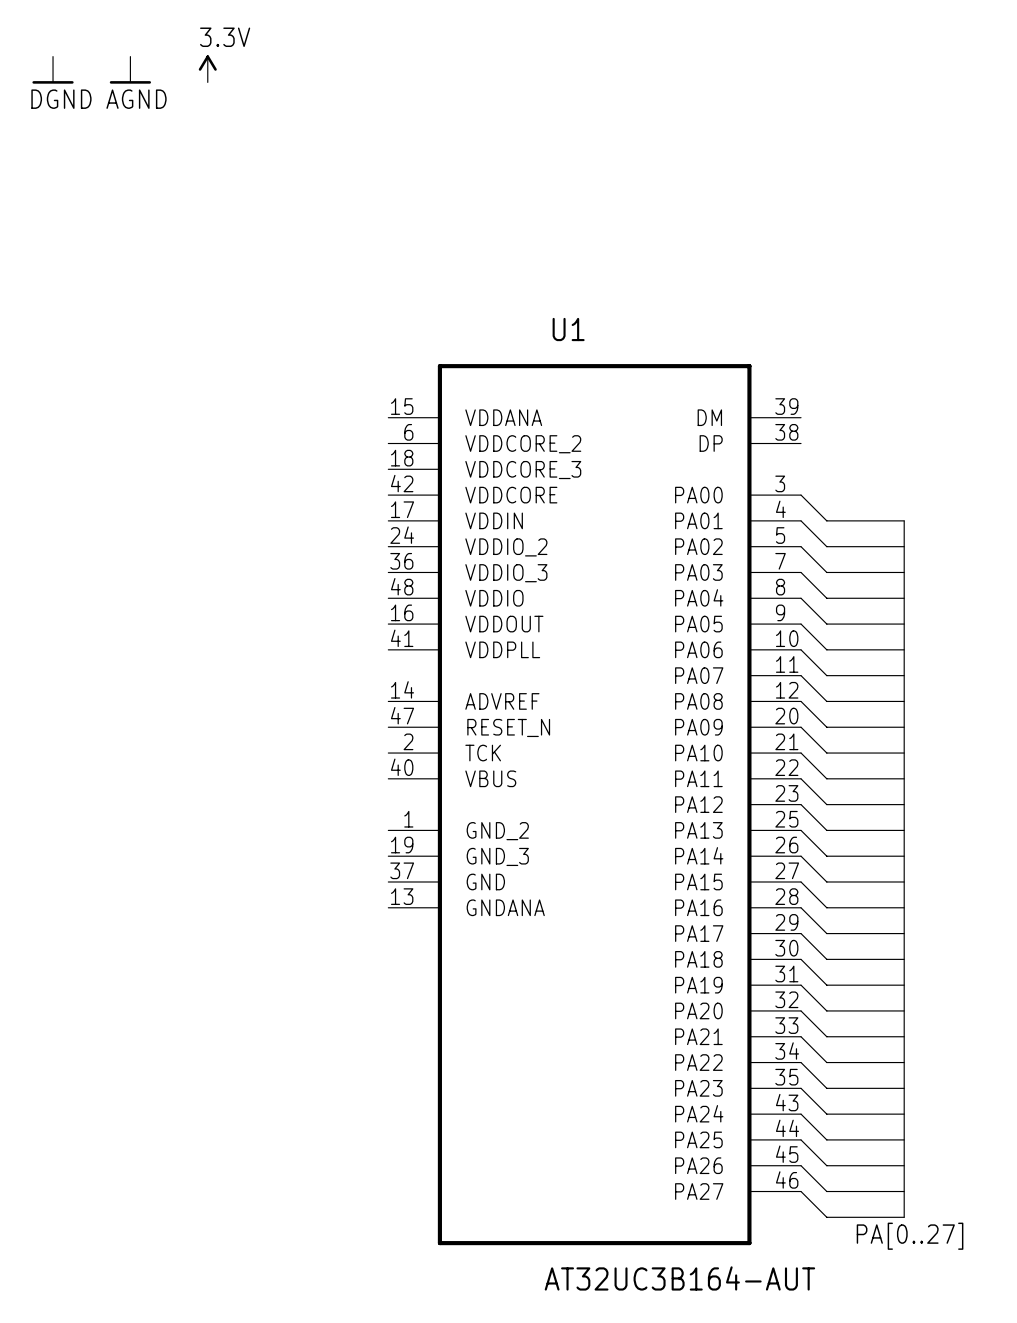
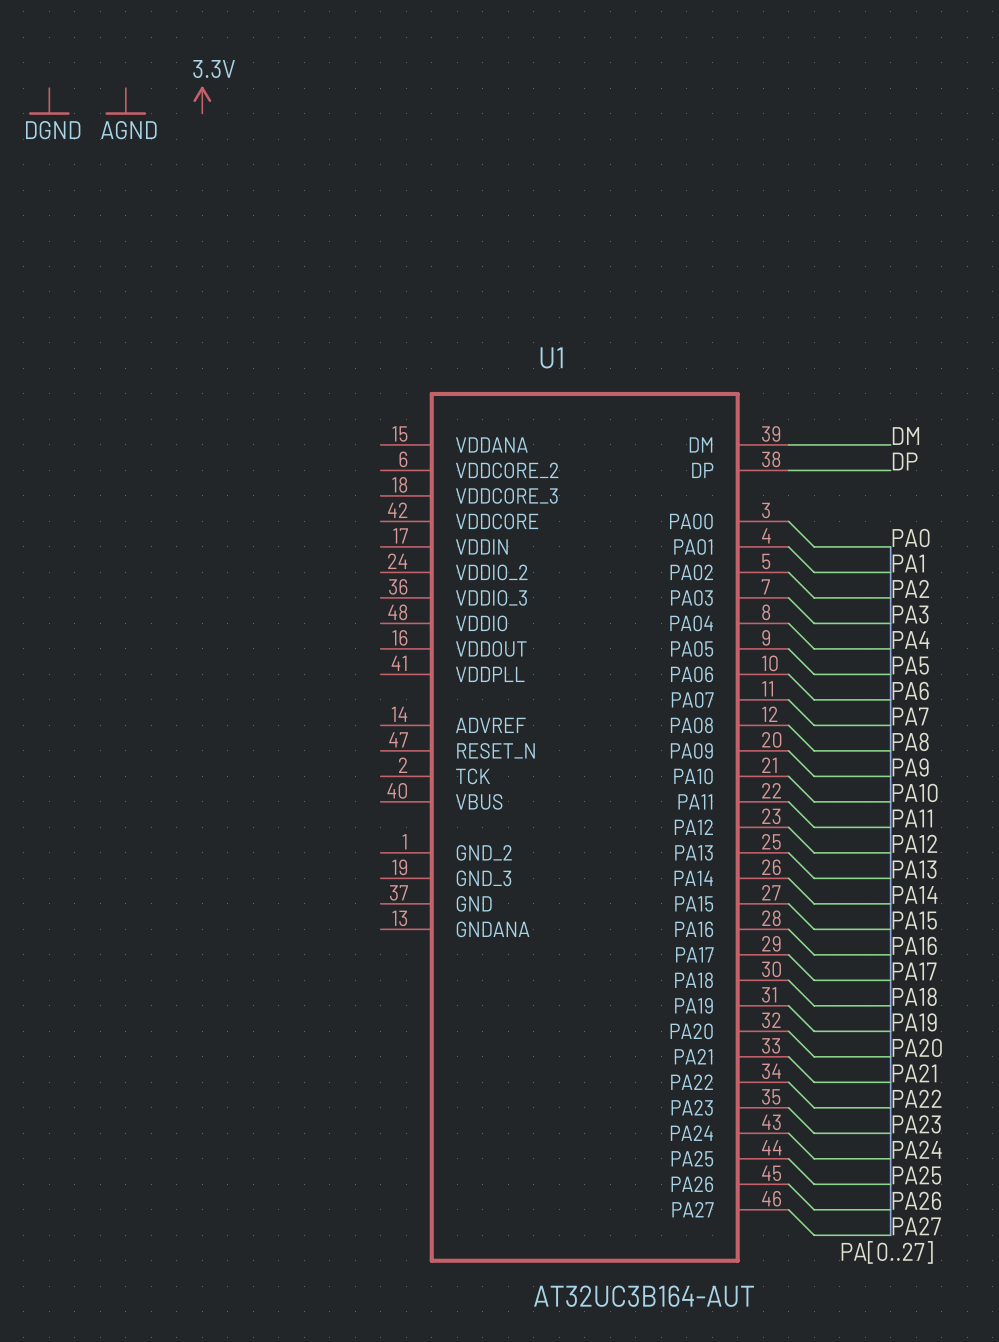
label: none -> DM (905, 436)
wire: none -> (788, 444) (890, 444)
label: none -> DP (905, 461)
wire: none -> (788, 470) (890, 470)
label: none -> PA0 (911, 538)
label: none -> PA1 (908, 563)
label: none -> PA2 (910, 588)
label: none -> PA3 (910, 614)
label: none -> PA4 (911, 639)
label: none -> PA5 (910, 665)
label: none -> PA6 (910, 690)
label: none -> PA7 (910, 716)
label: none -> PA8 (910, 741)
label: none -> PA9 (910, 767)
label: none -> PA10 (915, 792)
label: none -> PA11 (912, 818)
label: none -> PA12 (914, 843)
label: none -> PA13 (914, 869)
label: none -> PA14 (915, 894)
label: none -> PA15 (914, 920)
label: none -> PA16 (914, 945)
label: none -> PA17 (914, 971)
label: none -> PA18 (914, 996)
label: none -> PA19 (914, 1022)
label: none -> PA20 (917, 1047)
label: none -> PA21 (914, 1073)
label: none -> PA22 (917, 1098)
label: none -> PA23 (916, 1124)
label: none -> PA24 (917, 1149)
label: none -> PA25 (916, 1175)
label: none -> PA26 (916, 1200)
label: none -> PA27 (916, 1226)

